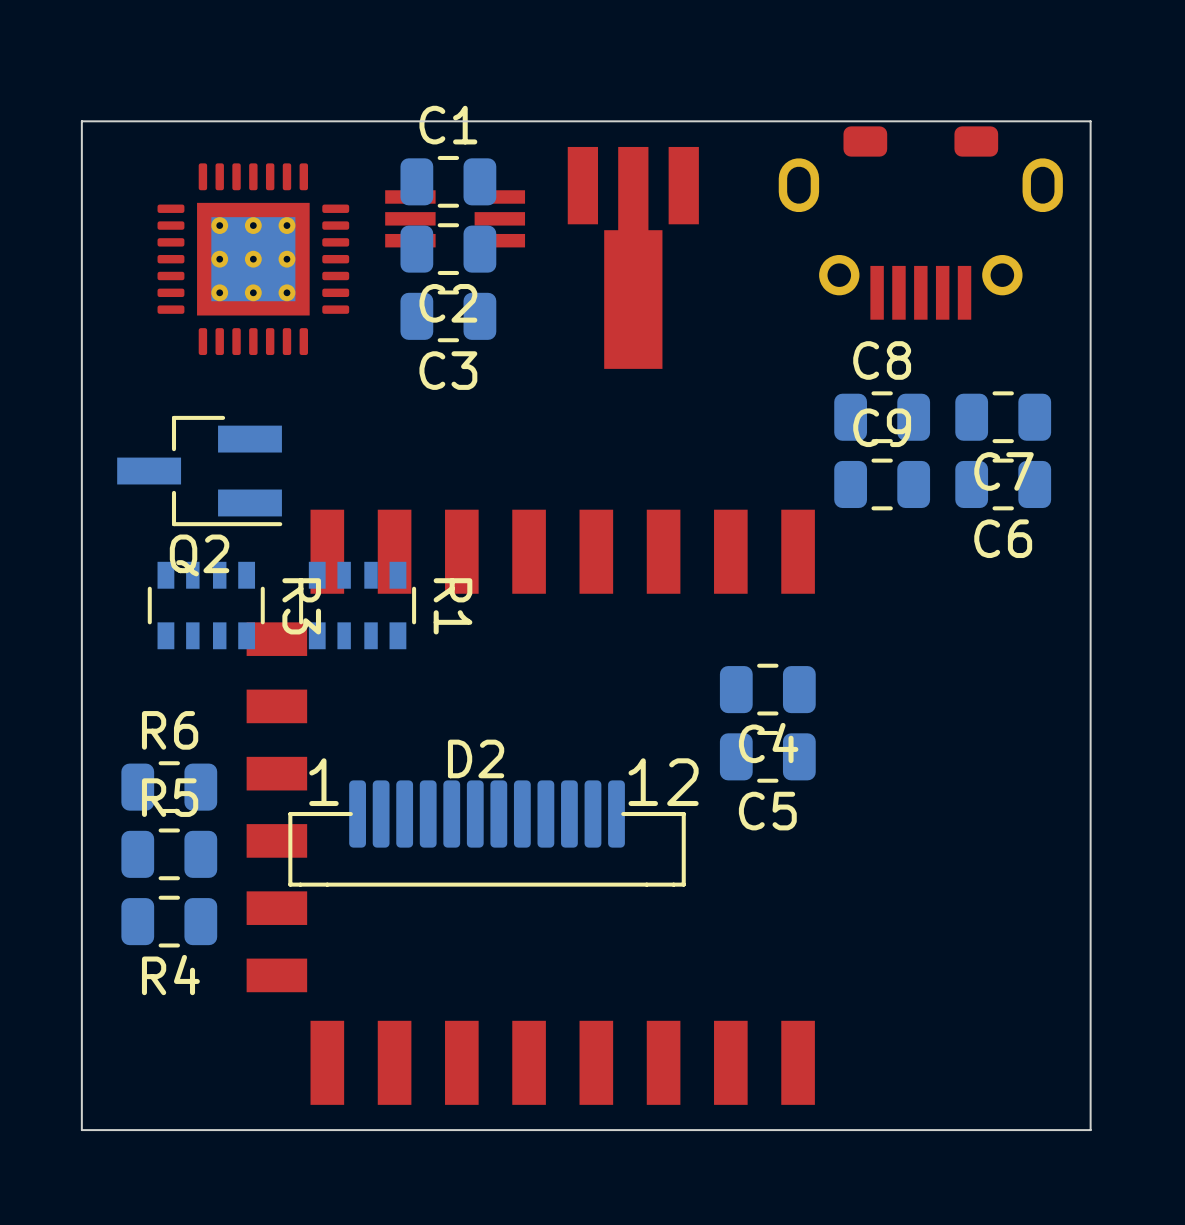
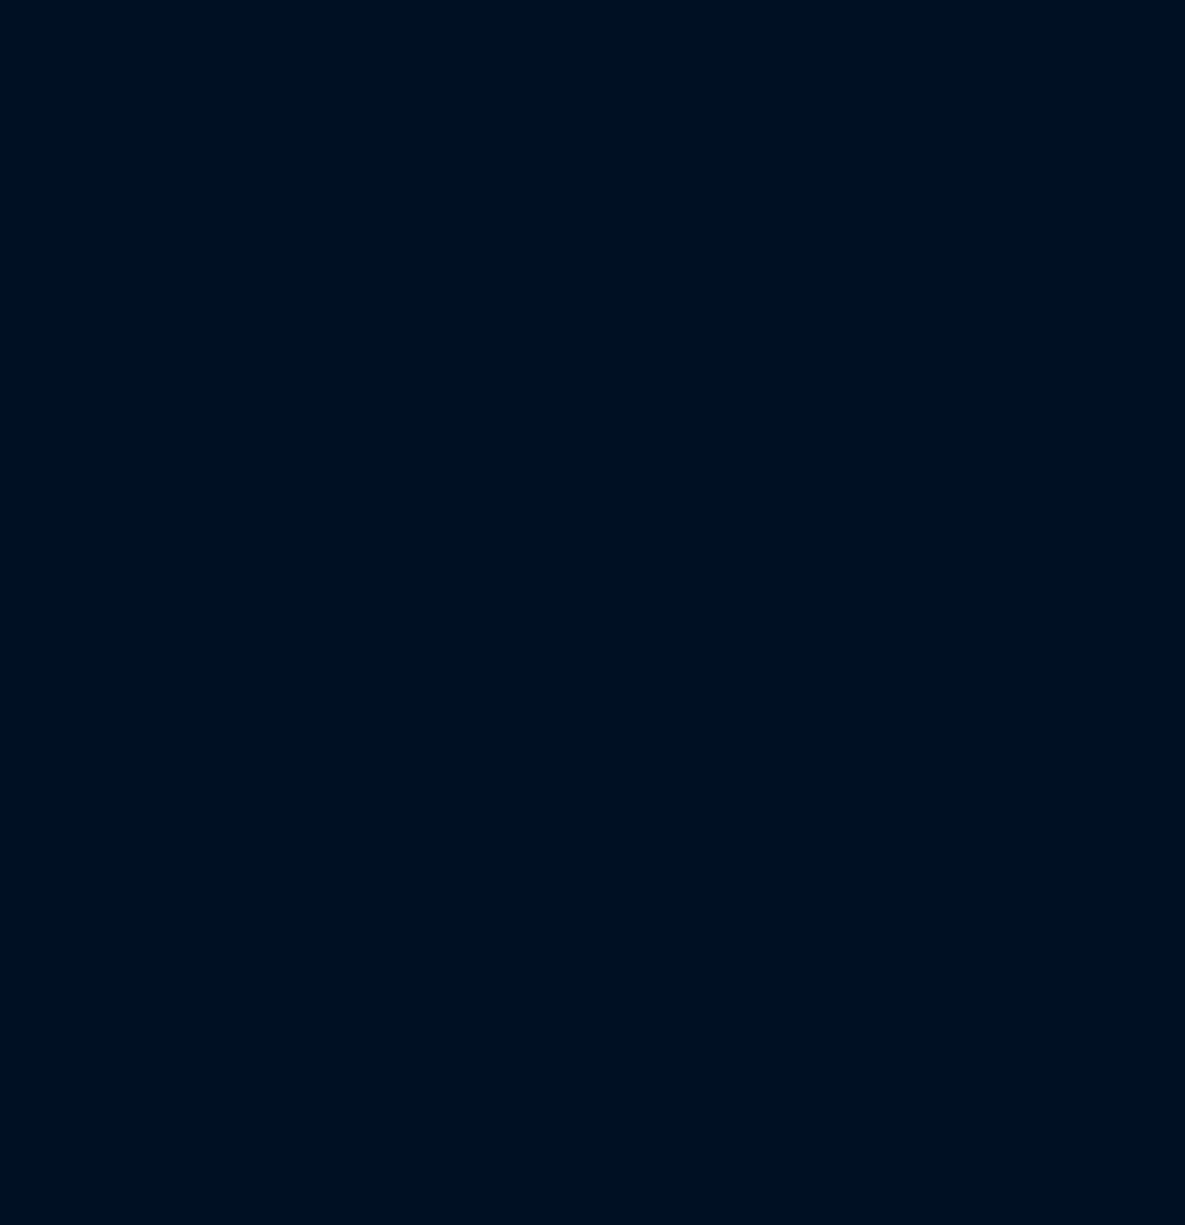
board edge: (1090, 121) (1090, 1130) (81, 1130) (81, 121) (1090, 121) -> none
C1: (448, 181) -> none
part: (455, 218) -> none
part: (920, 223) -> none
C2: (448, 249) -> none
part: (633, 257) -> none
part: (253, 259) -> none
C3: (448, 316) -> none
C8: (882, 417) -> none
C7: (1003, 417) -> none
Q2: (199, 471) -> none
C9: (882, 484) -> none
C6: (1003, 484) -> none
R3: (206, 605) -> none
R1: (357, 605) -> none
C4: (767, 689) -> none
C5: (767, 756) -> none
R6: (169, 787) -> none
part: (530, 807) -> none
D2: (487, 833) -> none
R5: (169, 854) -> none
R4: (169, 921) -> none

